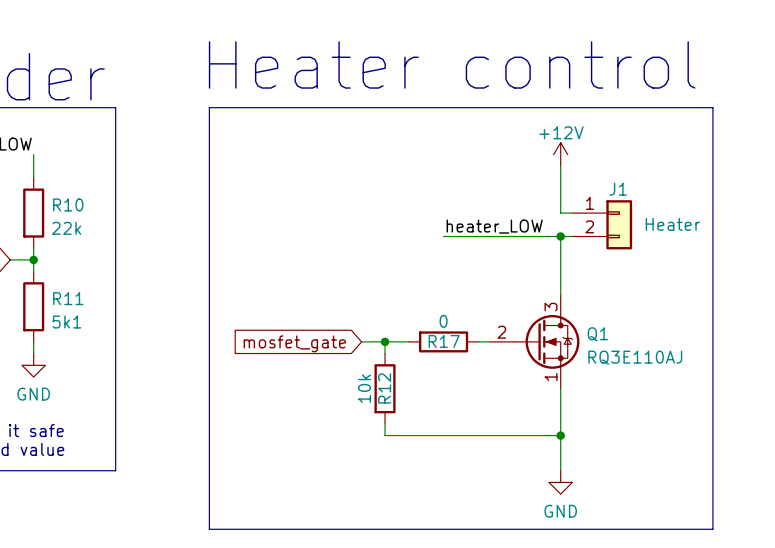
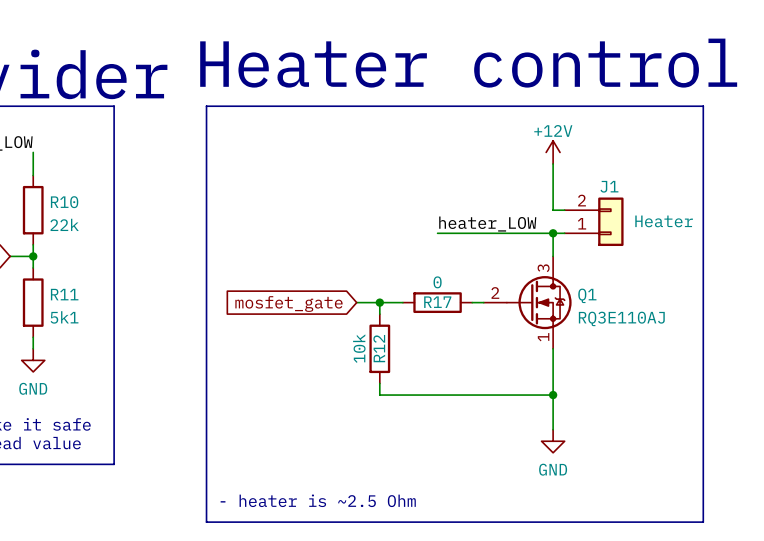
J1 flip: as is (619, 224) -> up-down (610, 221)
wire: (361, 341) (408, 341) -> (356, 302) (402, 302)
wire: (385, 341) (385, 353) -> (379, 302) (379, 314)
junction position: (385, 341) -> (379, 302)
R17 position: (443, 341) -> (437, 302)
wire: (478, 341) (490, 341) -> (472, 302) (483, 302)
Q1 position: (534, 341) -> (527, 302)
global label position: mosfet_gate (294, 343) -> mosfet_gate (288, 304)
wire: none -> (379, 383) (379, 395) (553, 395)
R12 position: (385, 388) -> (379, 348)
wire: (385, 423) (385, 435) (560, 435) (560, 470) -> none
junction position: (560, 435) -> (553, 395)
power symbol position: GND (560, 482) -> GND (553, 441)
text: none -> - heater is ~2.5 Ohm (318, 500)

